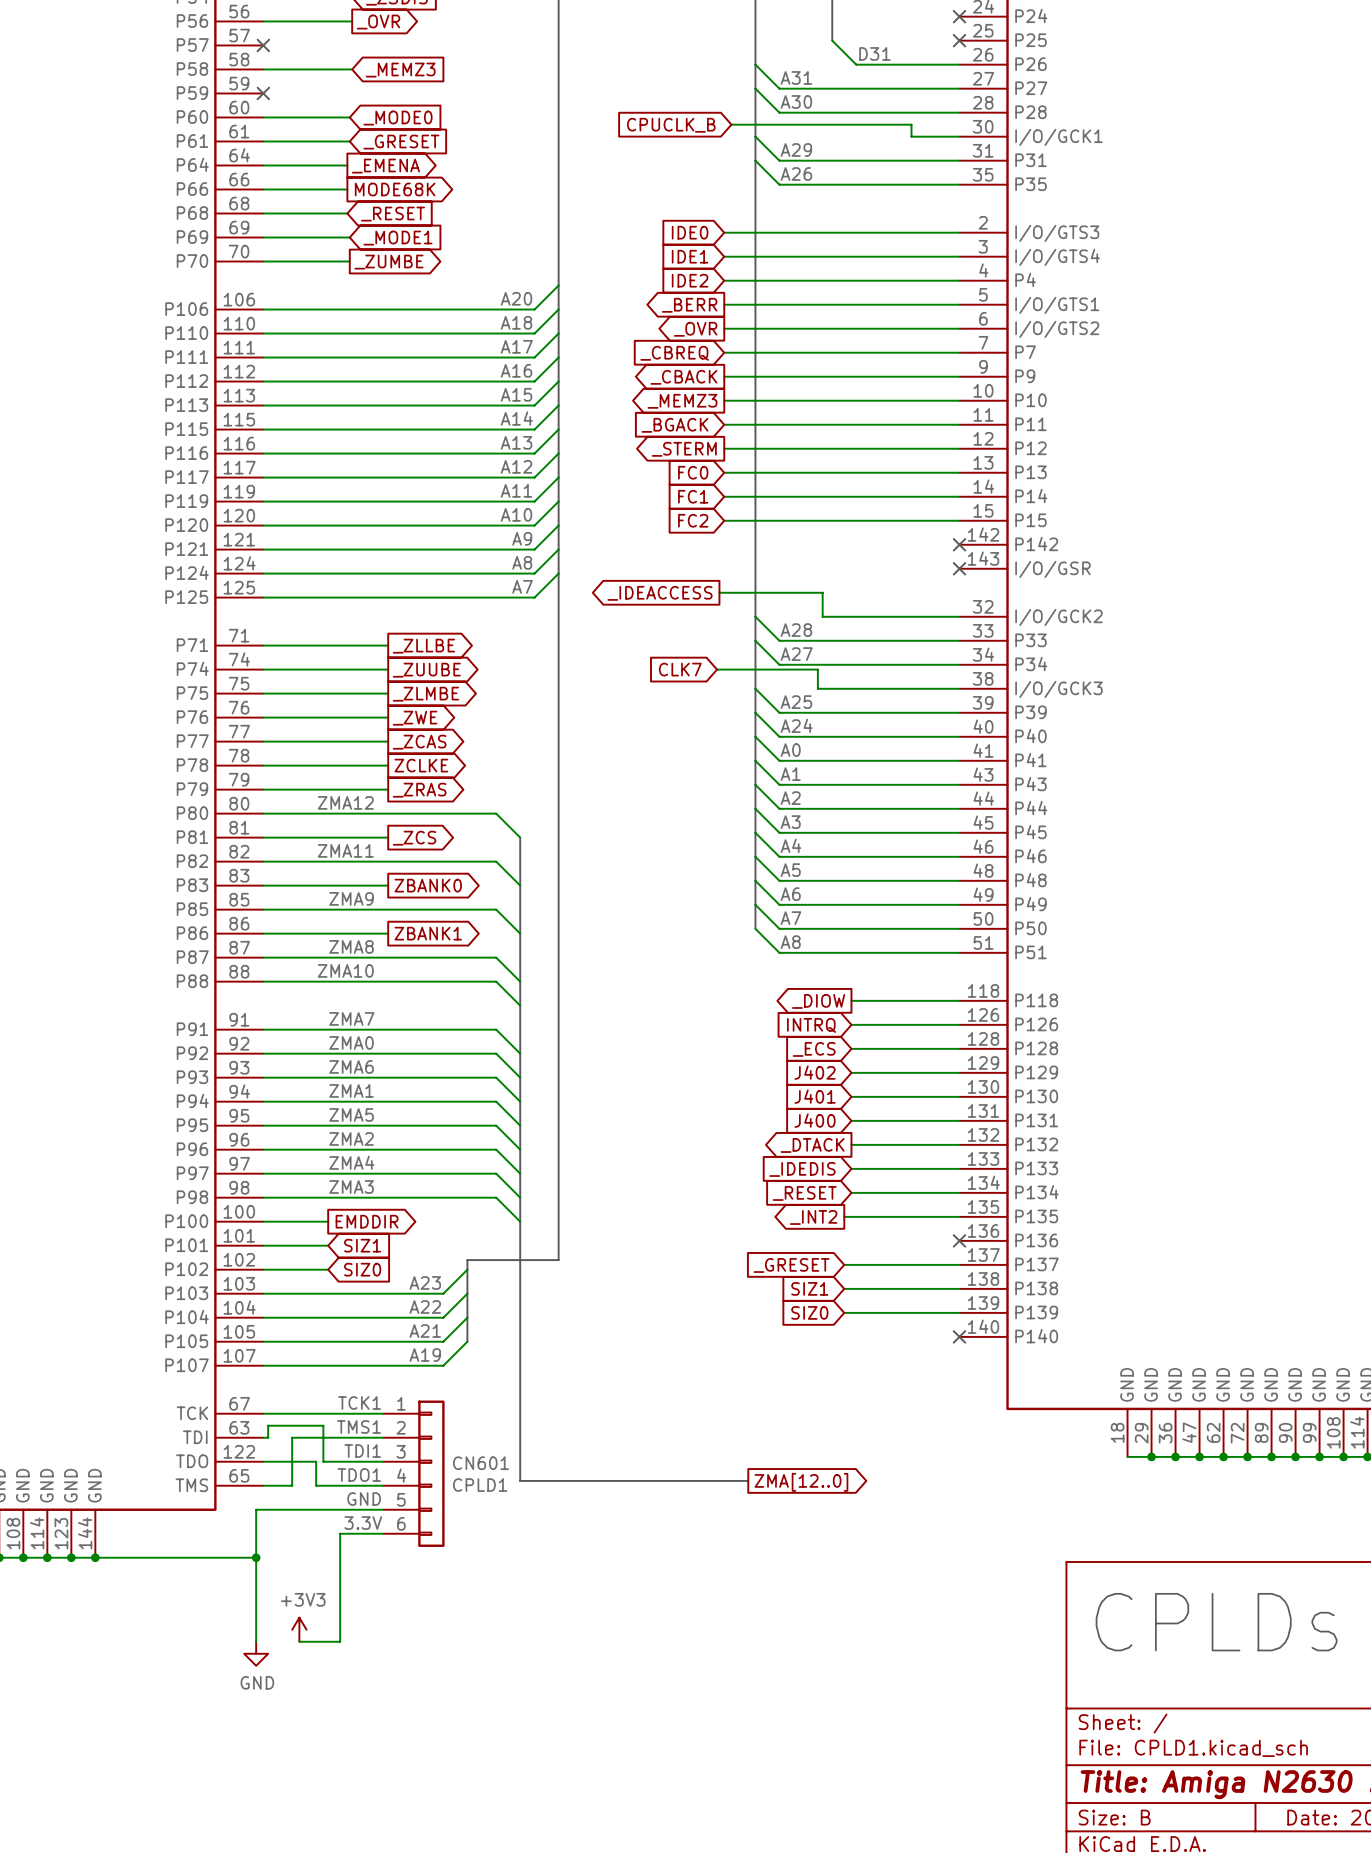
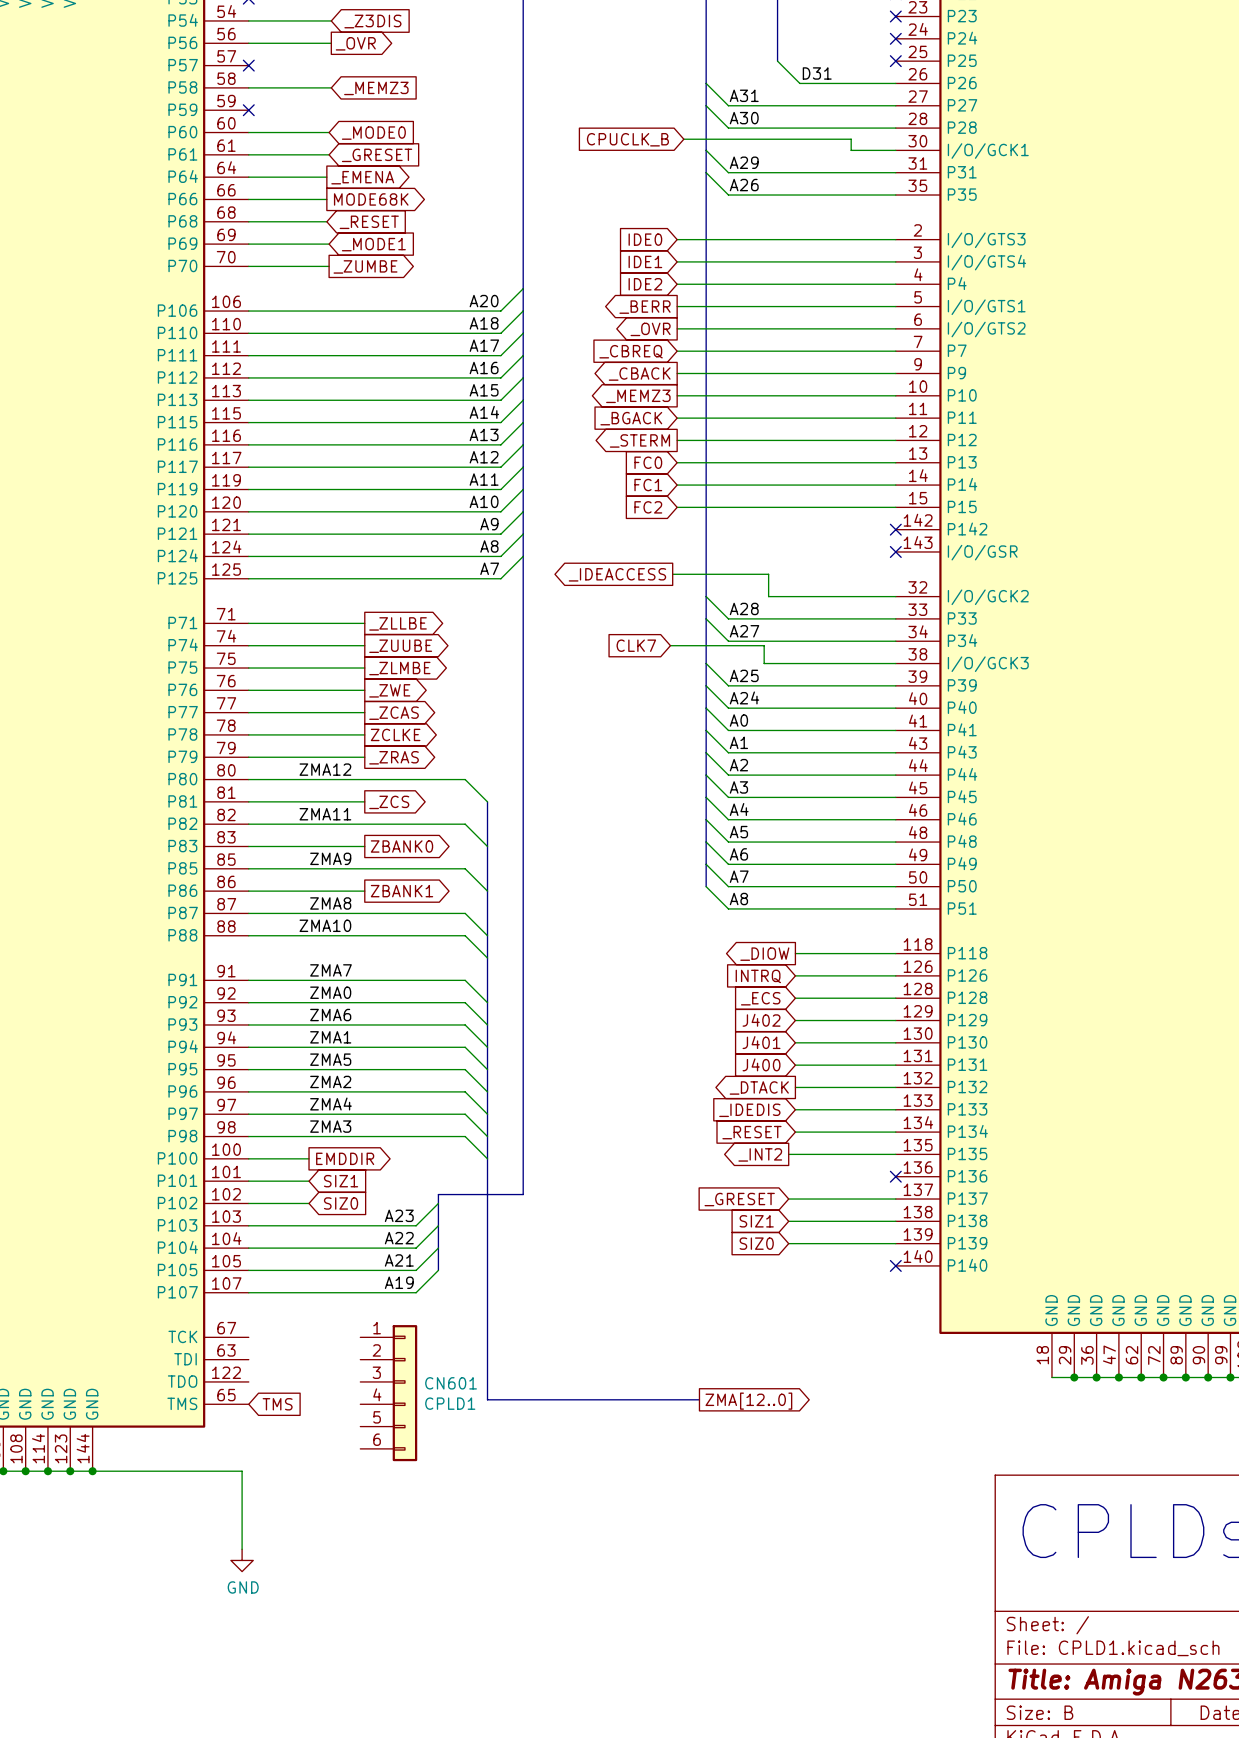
label: TCK1 (359, 1403) -> none
wire: (263, 1413) (383, 1413) -> none
label: TMS1 (359, 1427) -> none
wire: (263, 1437) (268, 1437) (268, 1425) (323, 1425) (323, 1461) (383, 1461) -> none
wire: (383, 1437) (292, 1437) (292, 1485) (263, 1485) -> none
label: TDI1 (362, 1451) -> none
wire: (263, 1461) (316, 1461) (316, 1485) (383, 1485) -> none
label: TDO1 (359, 1475) -> none
global label: none -> TMS (277, 1404)
label: GND (364, 1499) -> none
wire: (383, 1509) (256, 1509) (256, 1557) -> none
label: 3.3V (363, 1523) -> none
wire: (383, 1533) (340, 1533) (340, 1641) (299, 1641) -> none
junction: (256, 1557) -> none
power symbol: +3V3 (299, 1629) -> none

